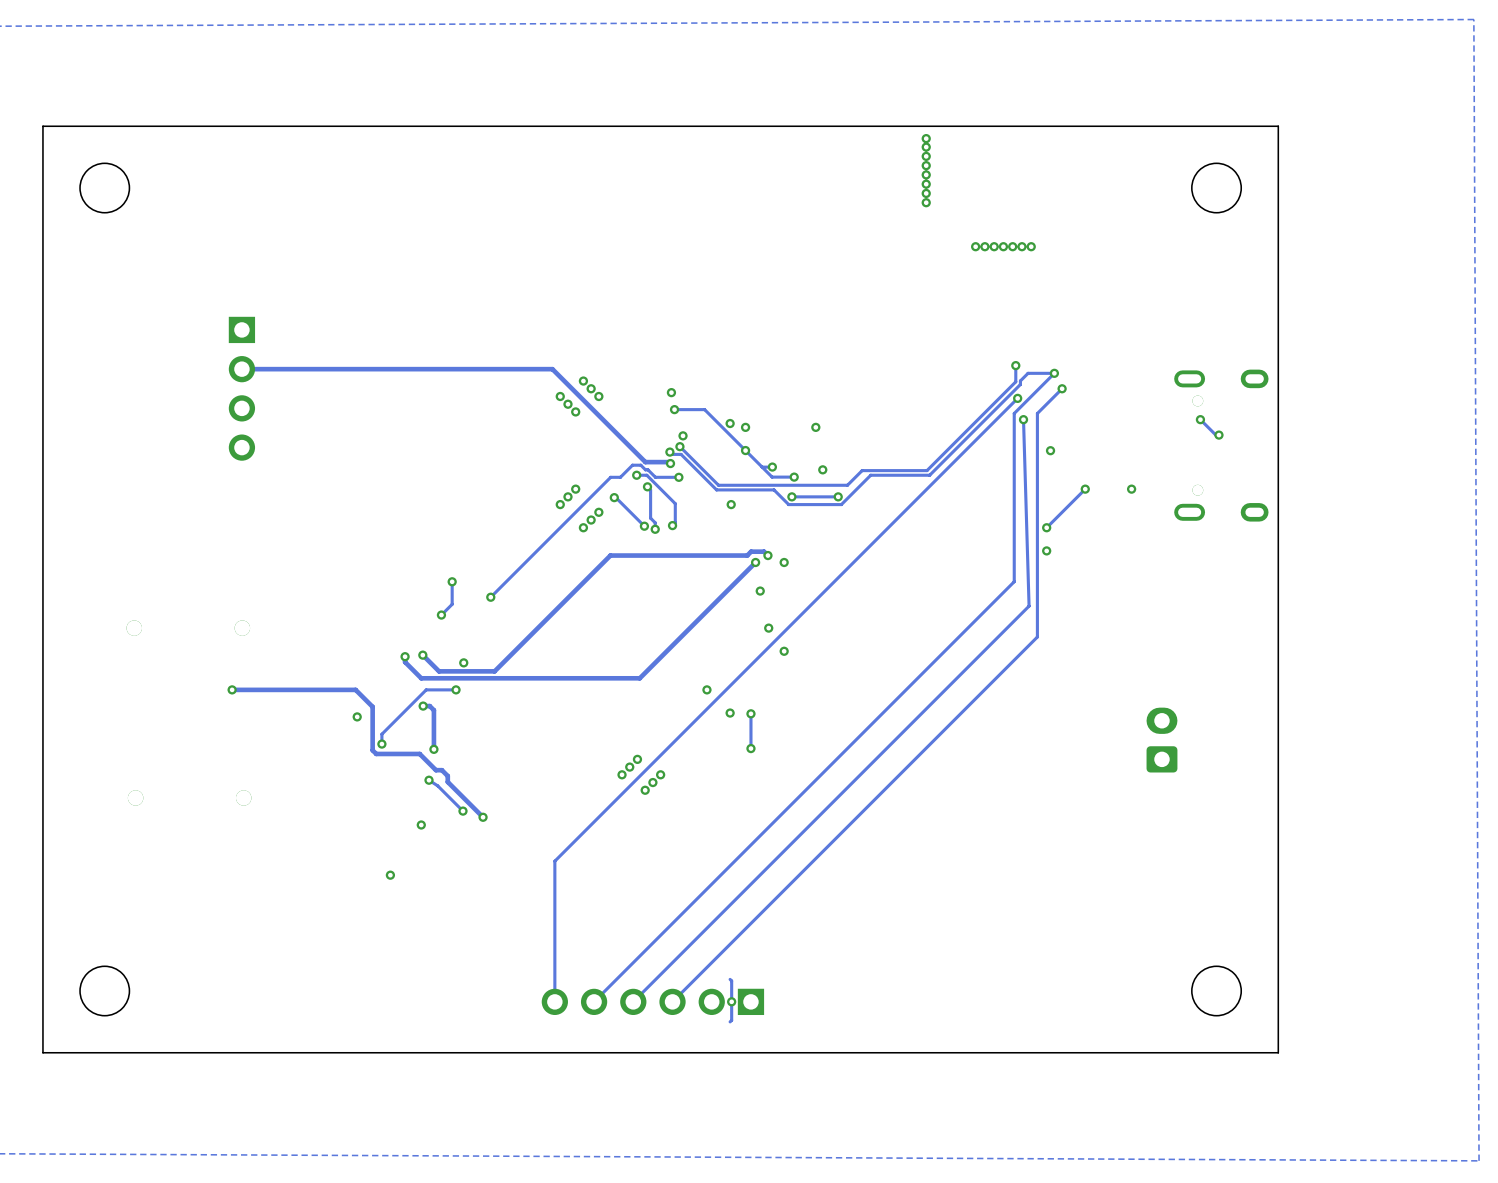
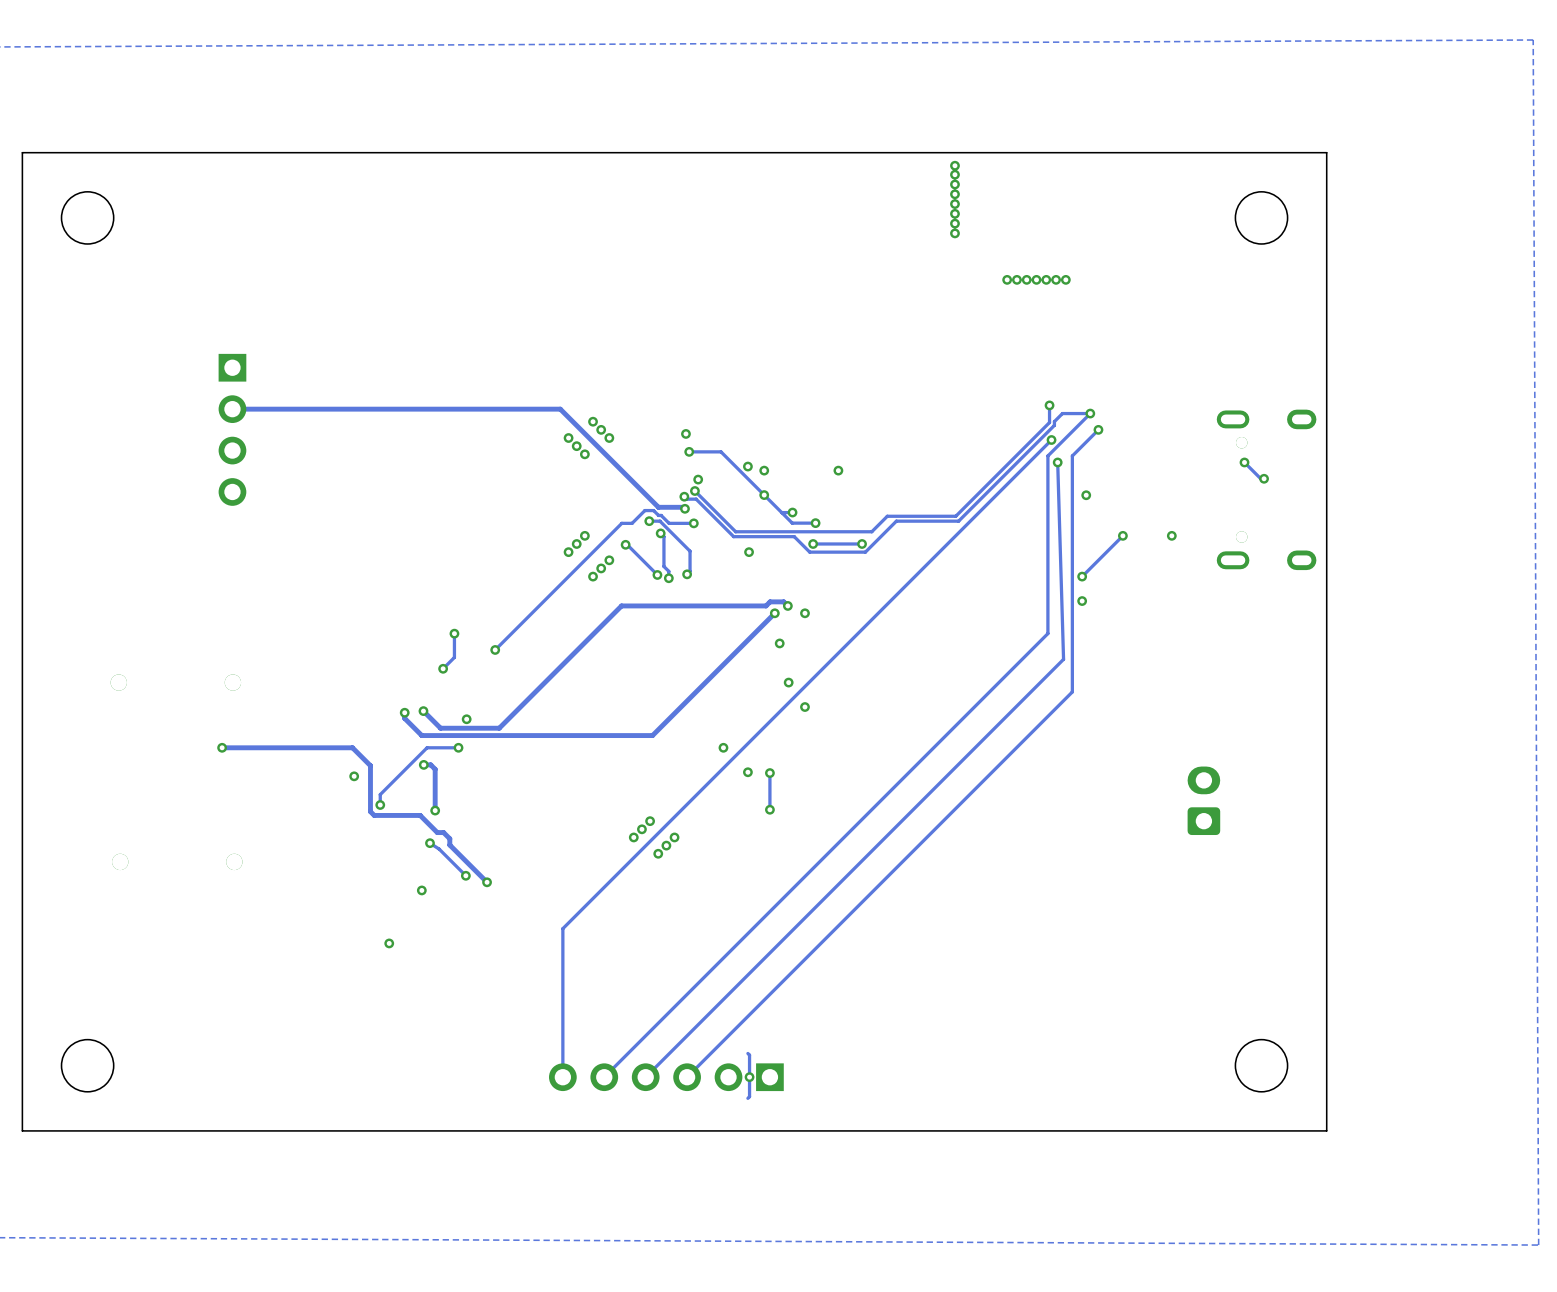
via: (822, 469) -> none

